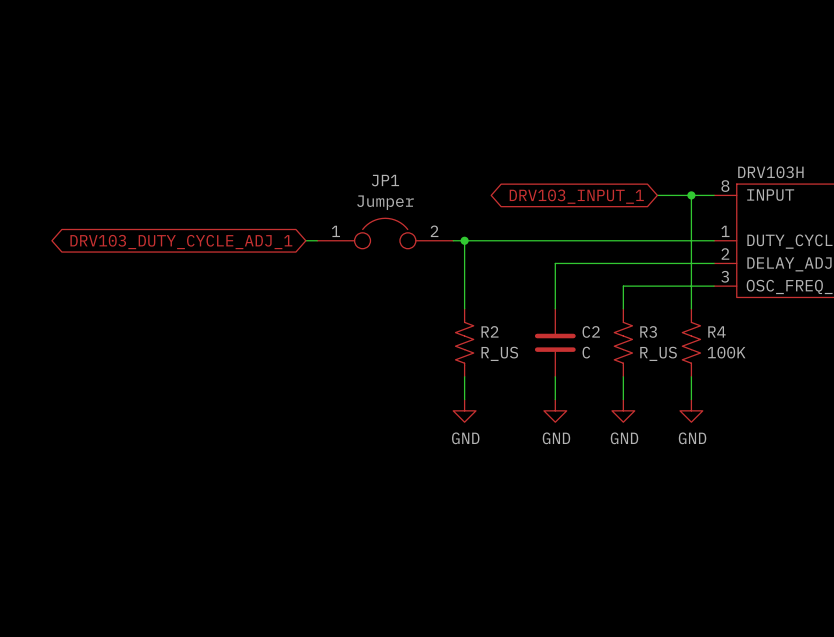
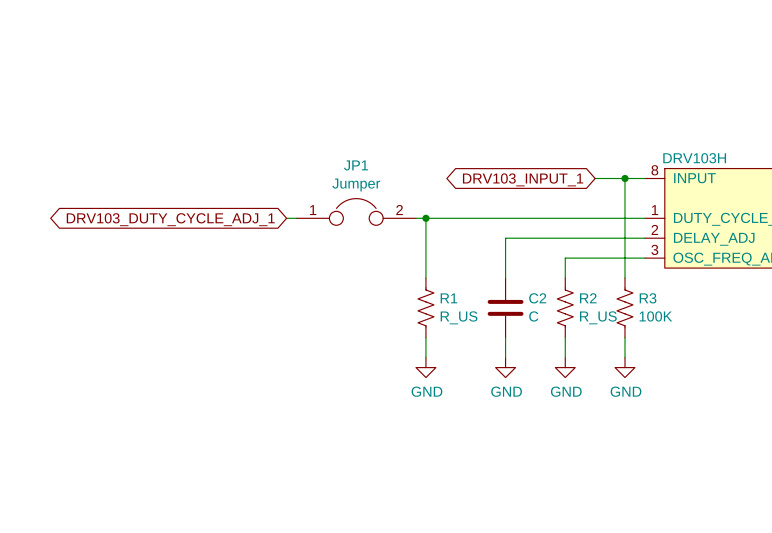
R2 name: R2 (489, 331) -> R1 (448, 298)
R3 name: R3 (648, 331) -> R2 (588, 298)
R4 name: R4 (716, 331) -> R3 (648, 298)

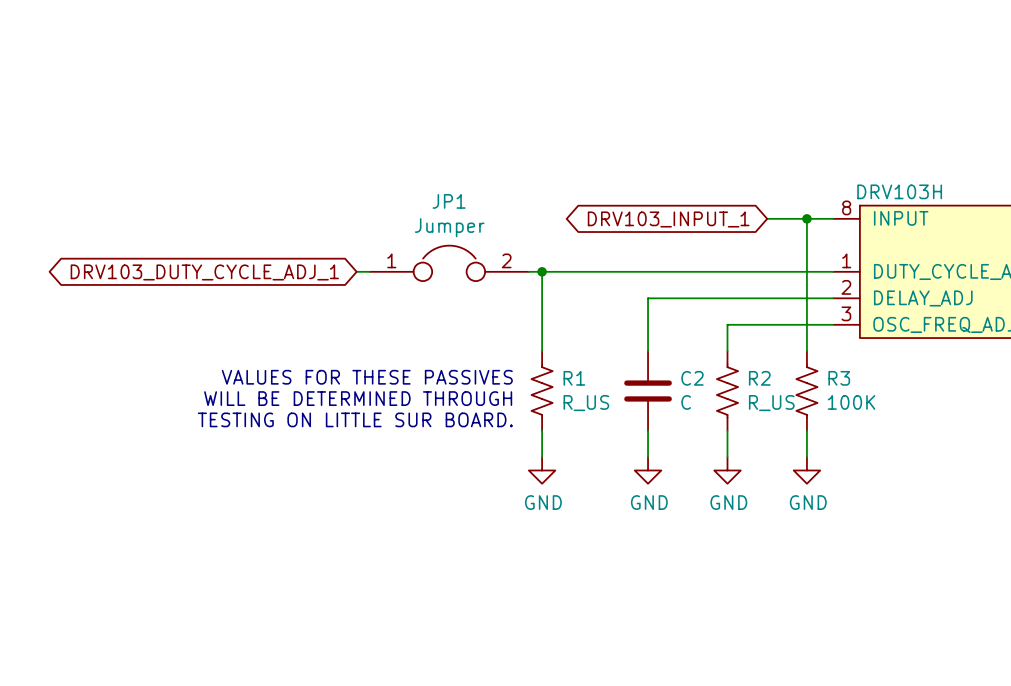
text: none -> VALUES FOR THESE PASSIVES (367, 377)
text: none -> WILL BE DETERMINED THROUGH (358, 398)
text: none -> TESTING ON LITTLE SUR BOARD. (355, 419)

